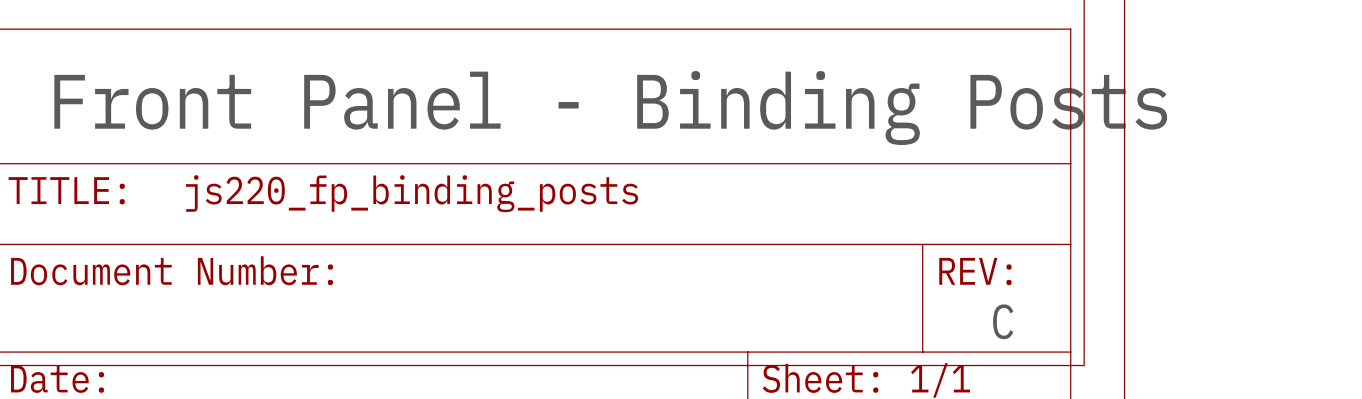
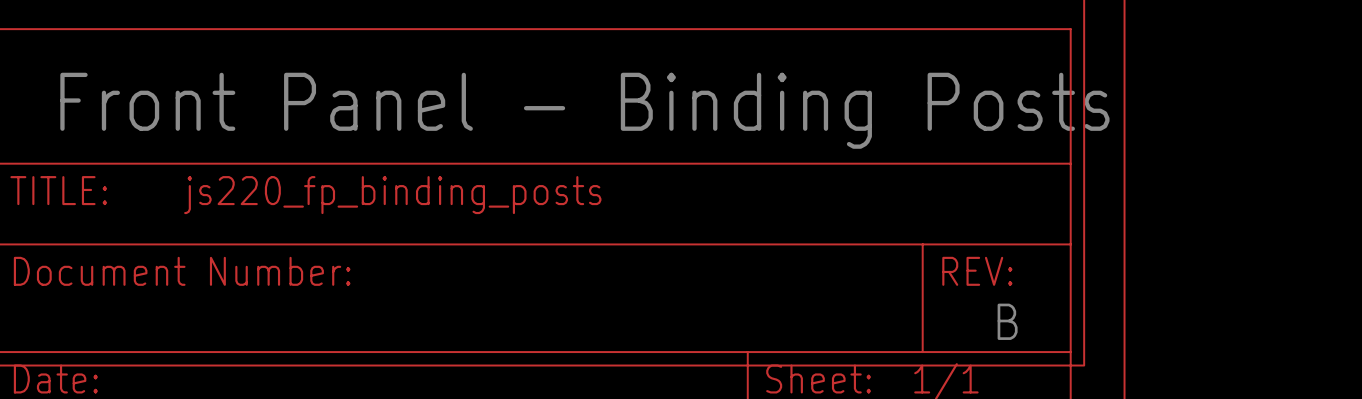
text: C (1003, 321) -> B (1007, 321)

